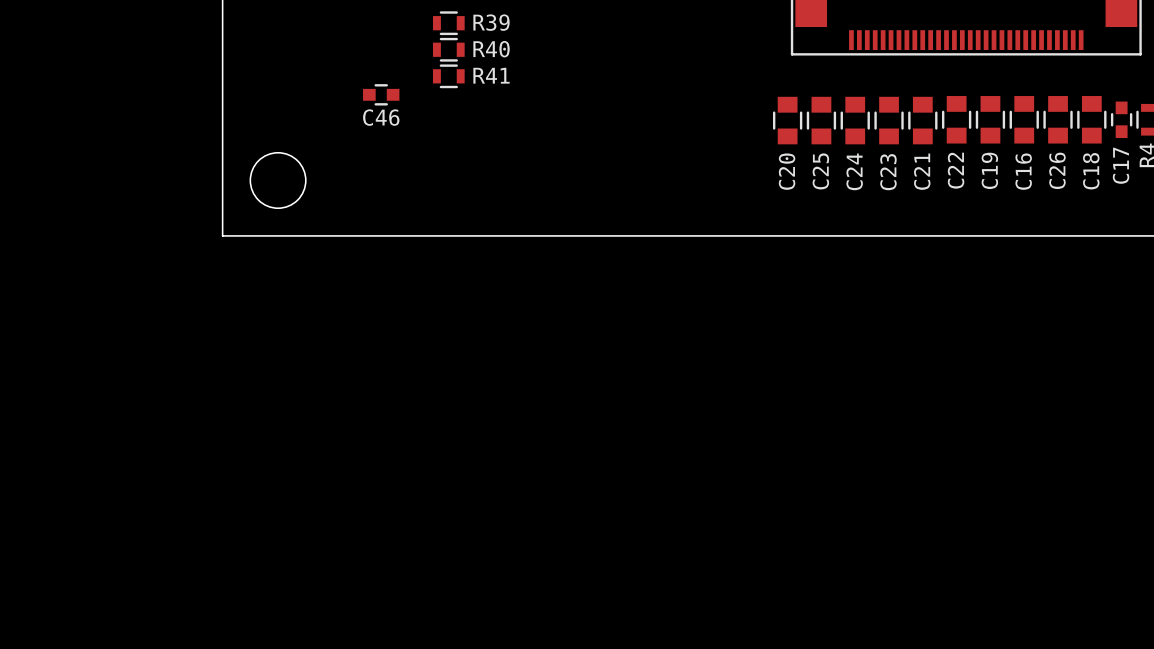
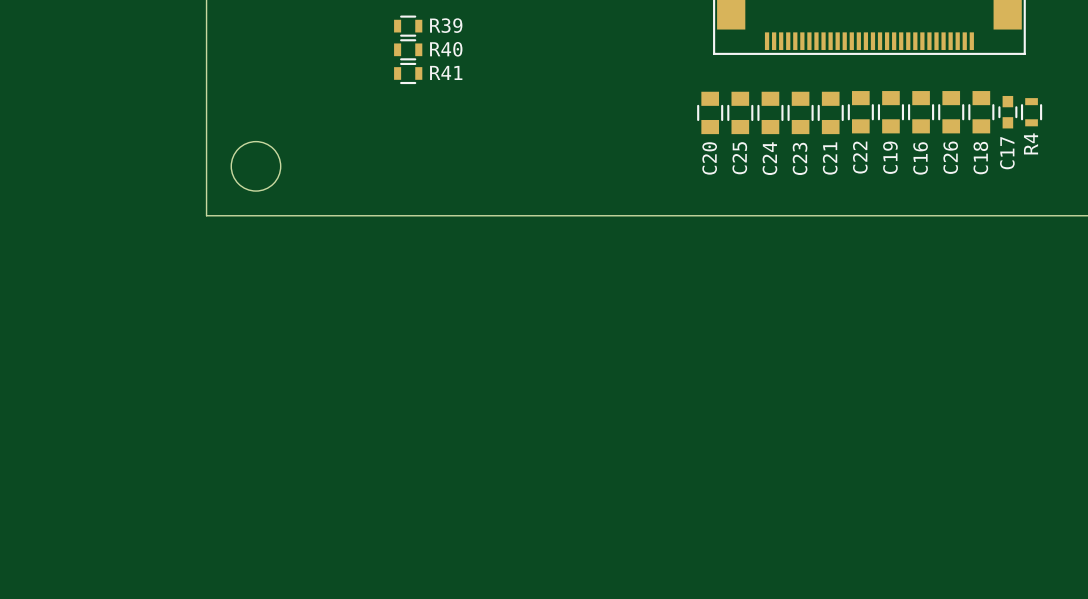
C46: (381, 94) -> none

